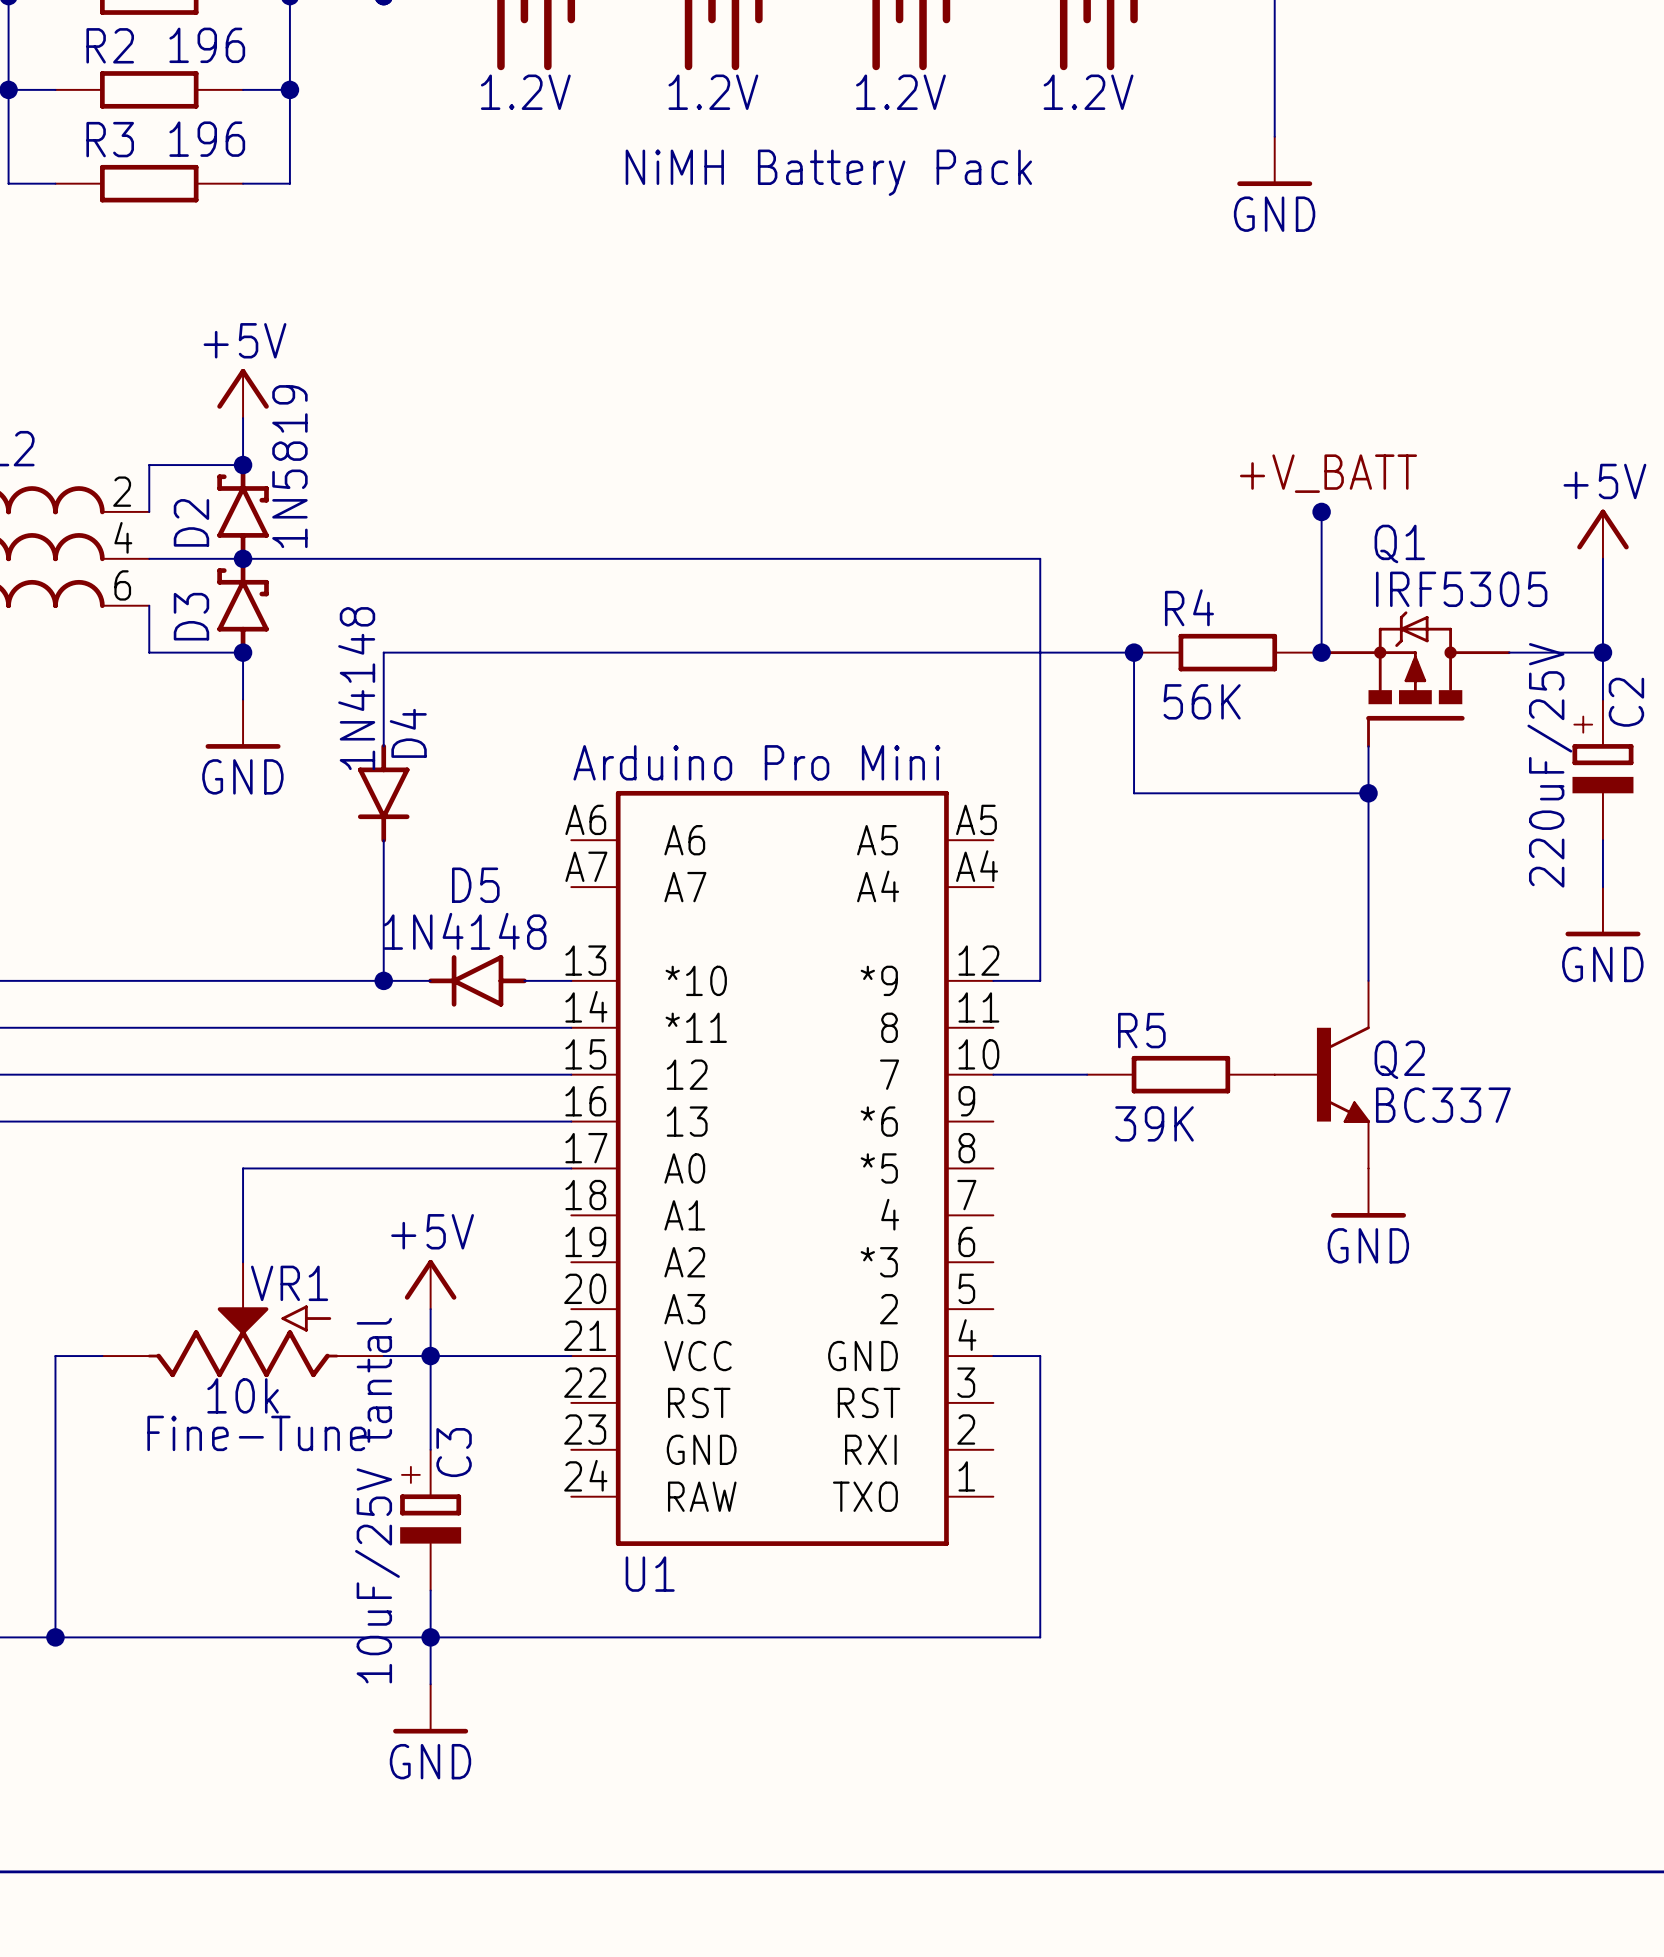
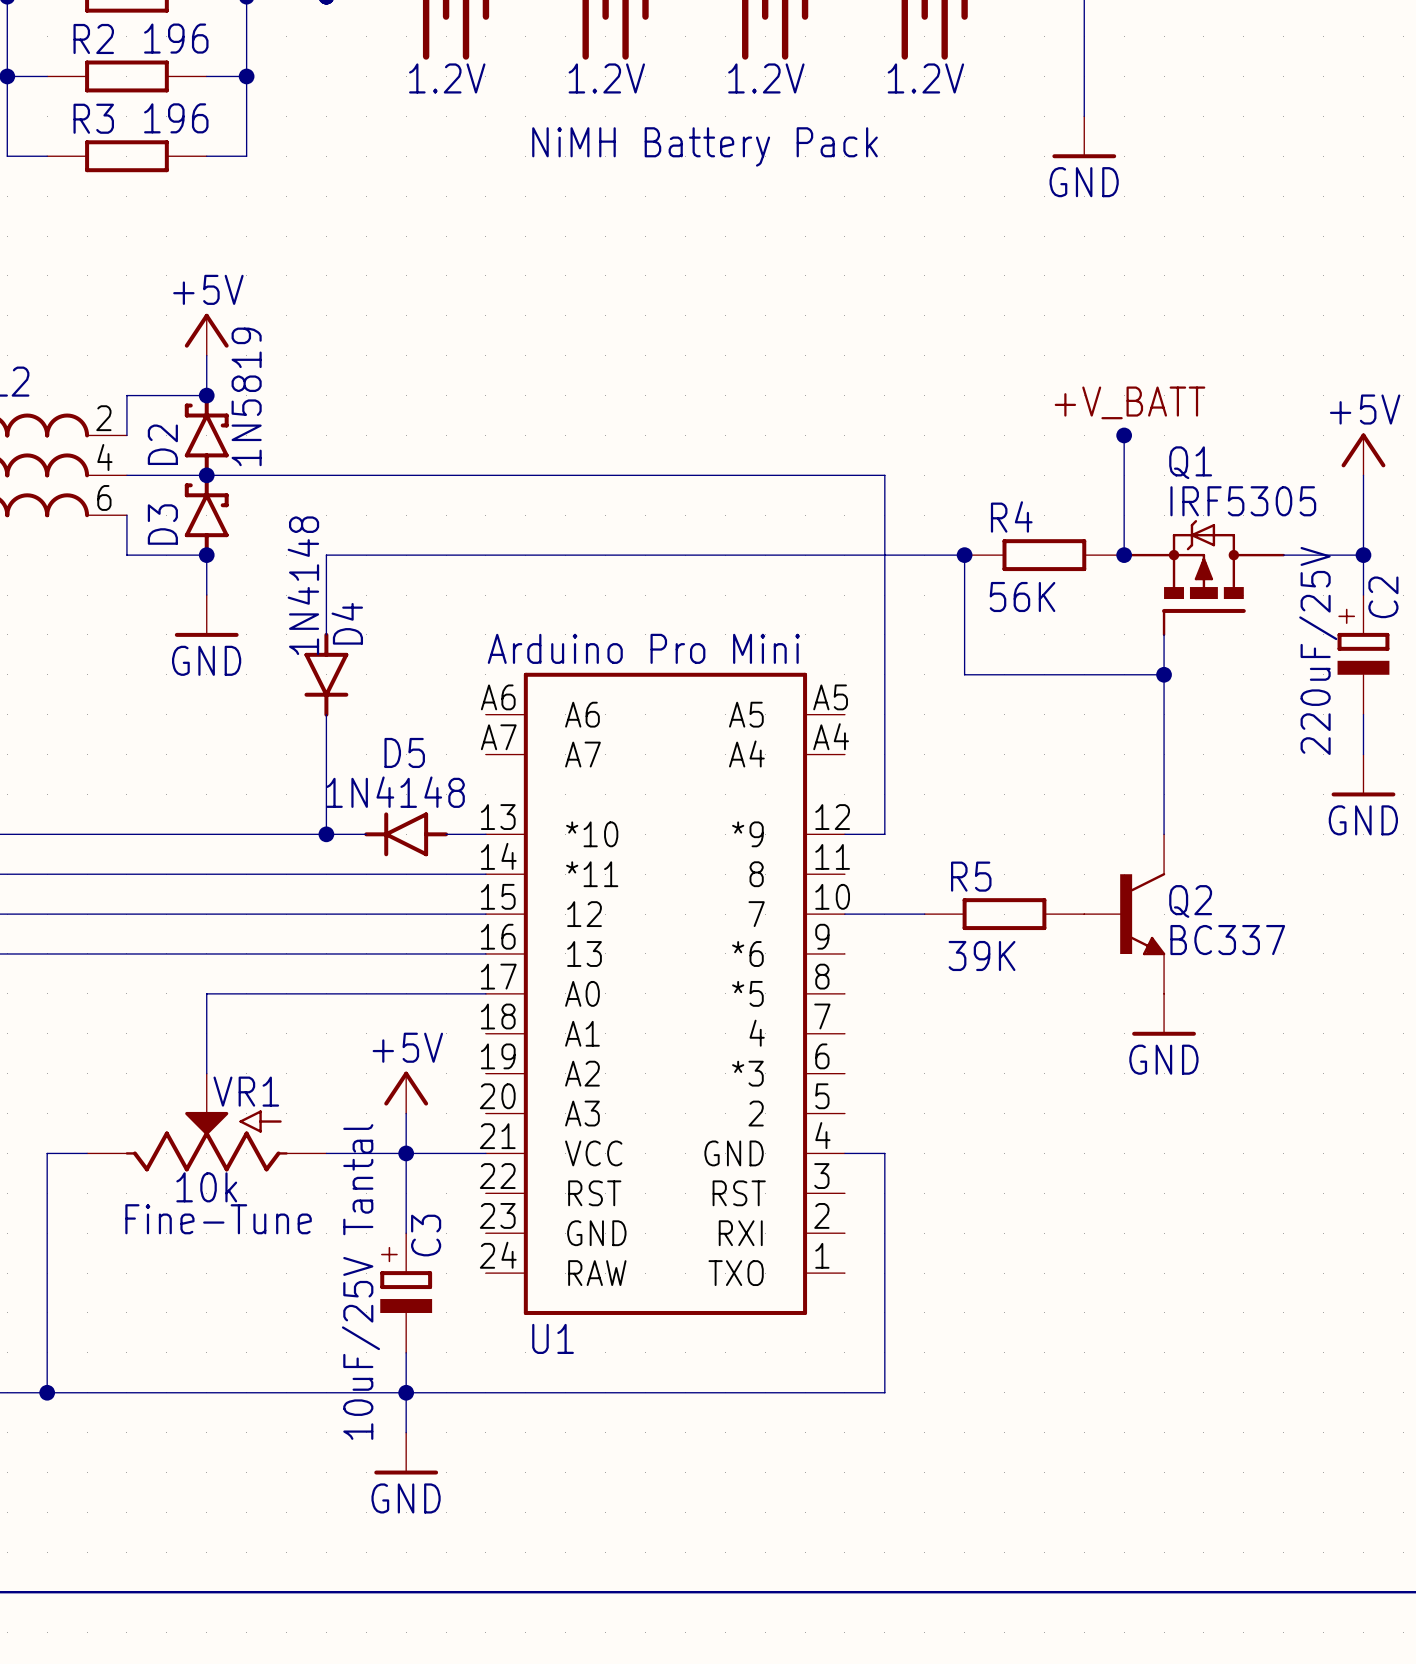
power symbol position: +5V (430, 1284) -> +5V (406, 1092)
wire: (430, 1309) (430, 1449) -> (406, 1113) (406, 1233)
junction position: (430, 1356) -> (406, 1153)
C3 value: 10uF/25V tantal (377, 1500) -> 10uF/25V Tantal (360, 1282)
C3 position: (430, 1520) -> (406, 1293)
wire: (430, 1590) (430, 1684) -> (406, 1352) (406, 1432)
junction position: (430, 1637) -> (406, 1392)
power symbol position: GND (430, 1708) -> GND (406, 1453)

